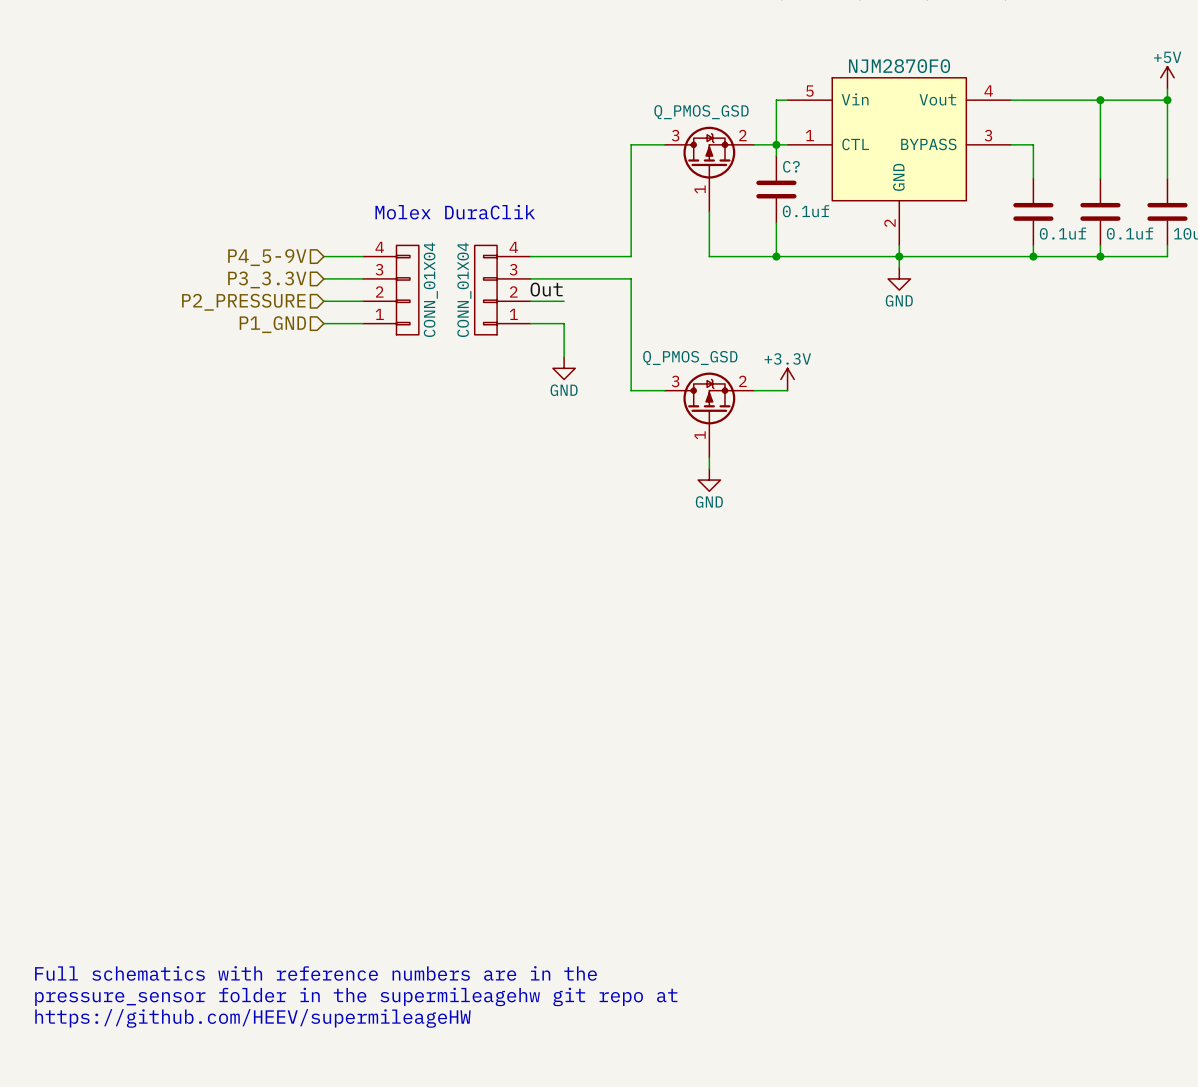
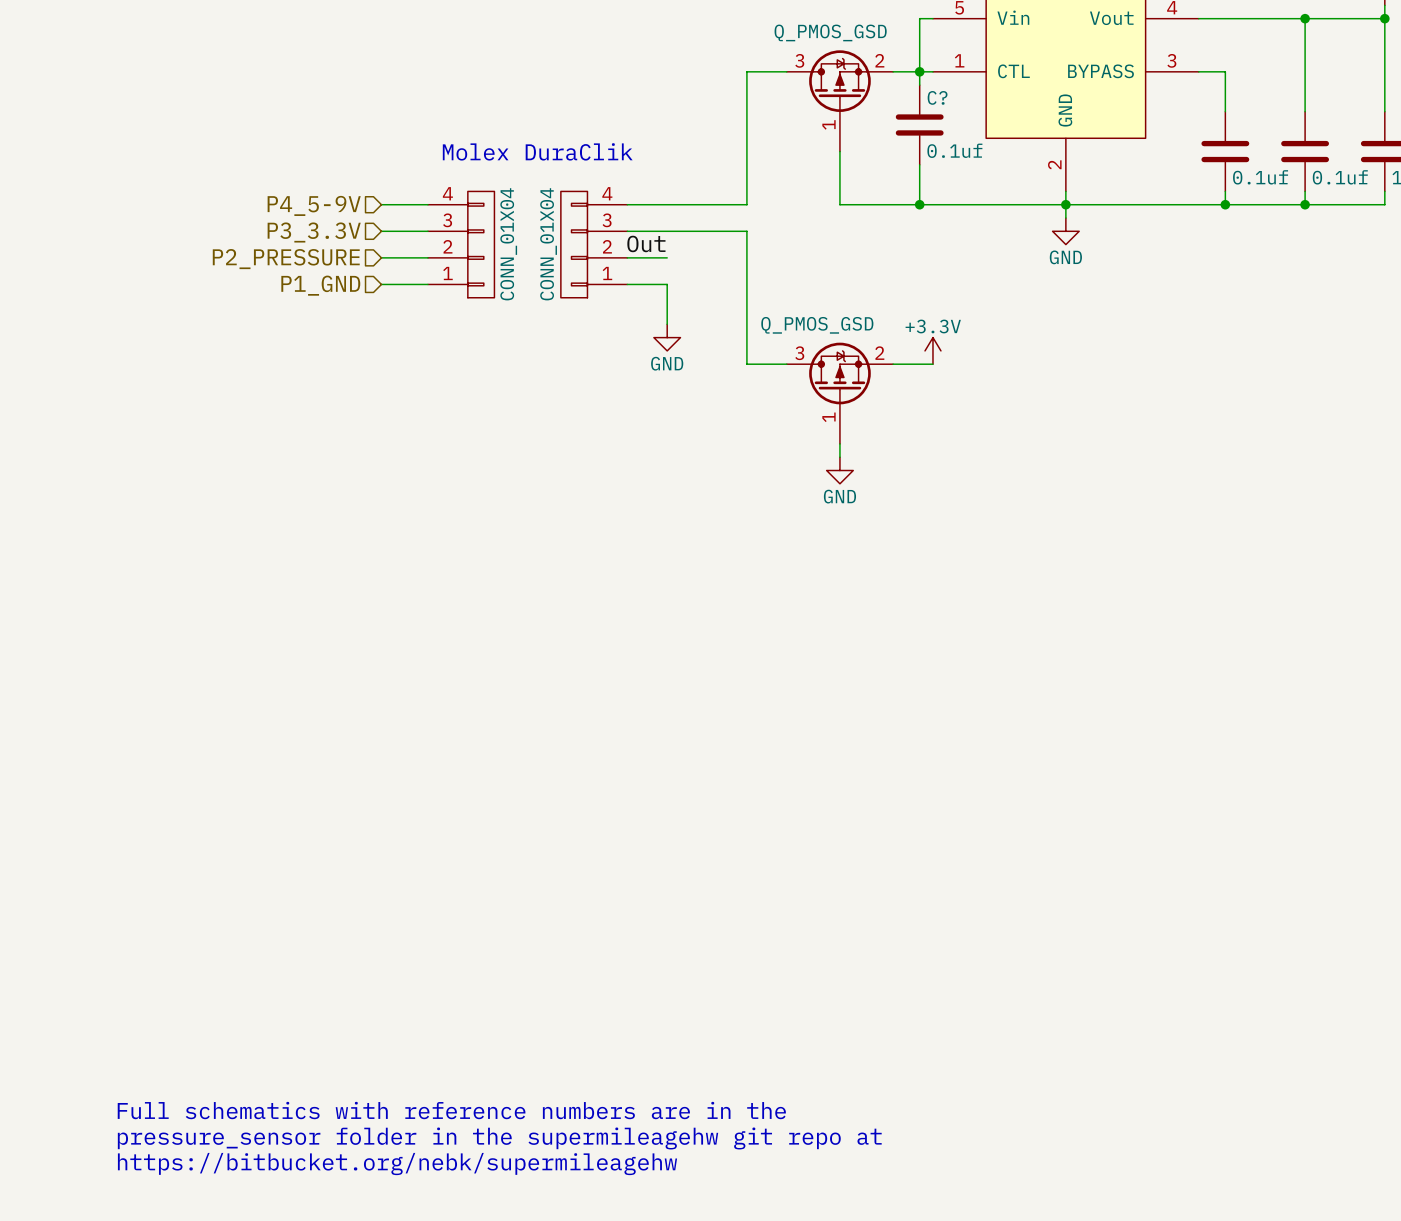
text position: Full schematics with reference numbers are in the (315, 973) -> Full schematics with reference numbers are in the (451, 1110)
text position: pressure_sensor folder in the supermileagehw git repo at (356, 996) -> pressure_sensor folder in the supermileagehw git repo at (499, 1138)
text: https://github.com/HEEV/supermileageHW (252, 1018) -> none
text: none -> https://bitbucket.org/nebk/supermileagehw (397, 1164)

